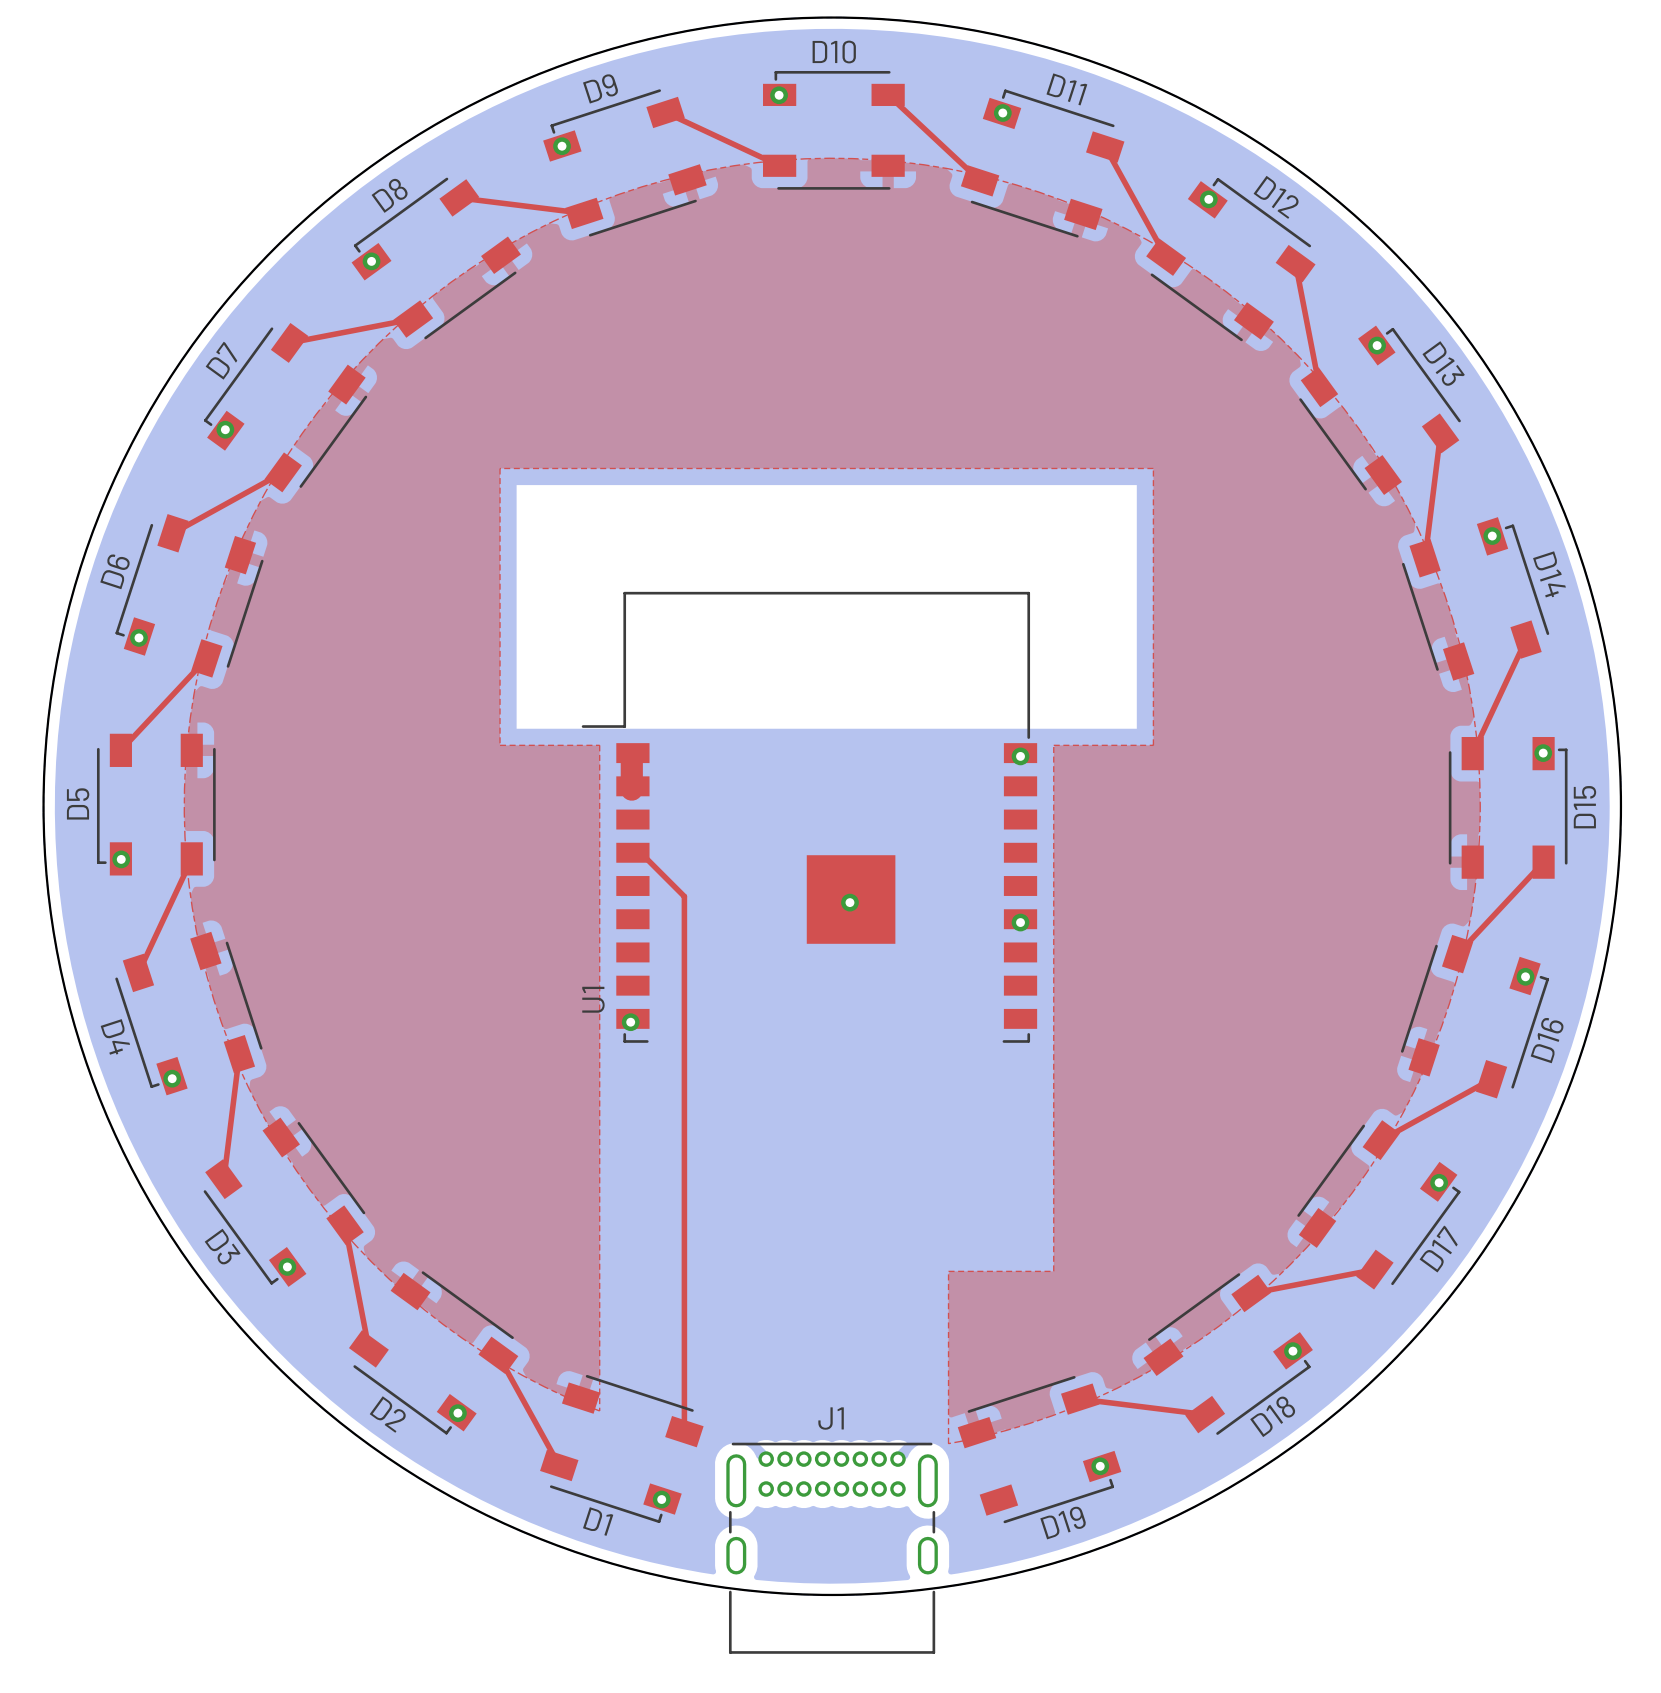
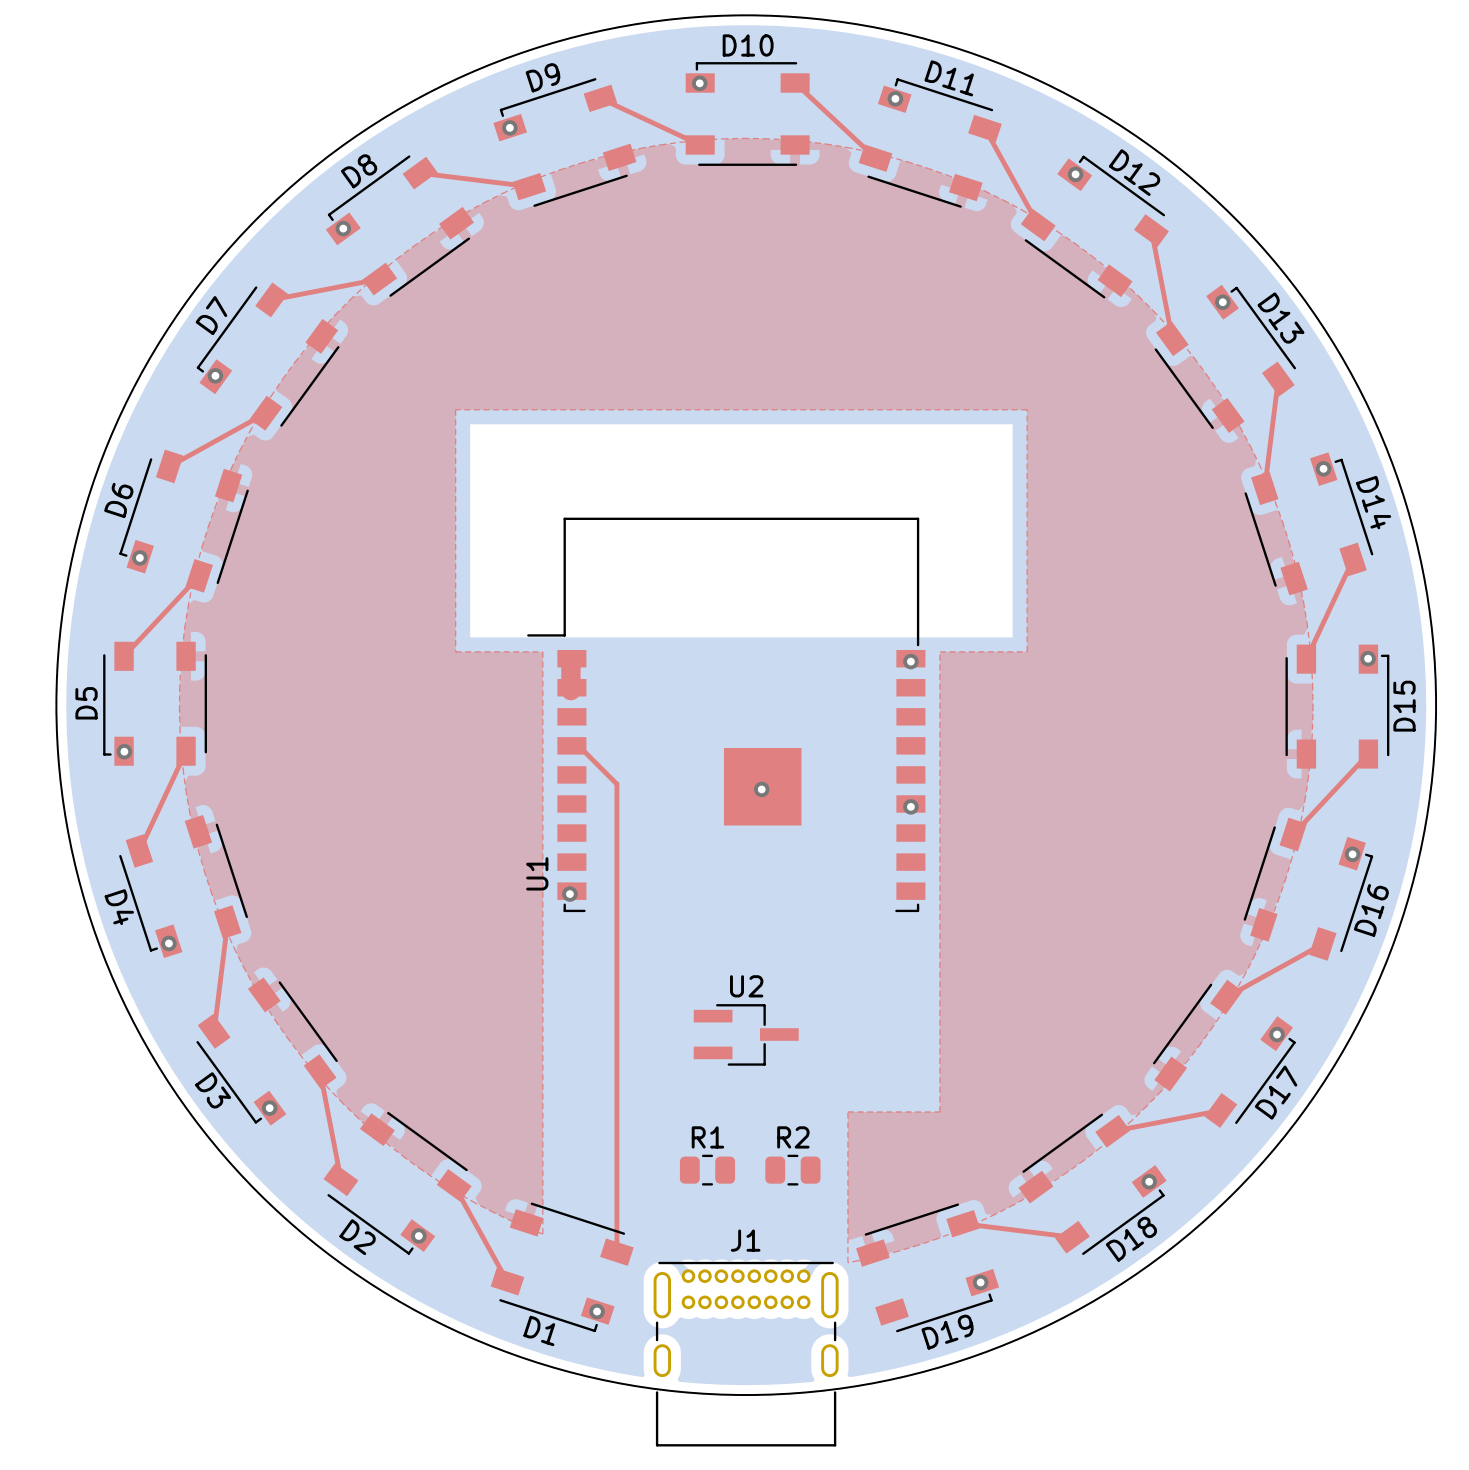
U2: none -> (746, 1034)
R1: none -> (707, 1170)
R2: none -> (792, 1170)

